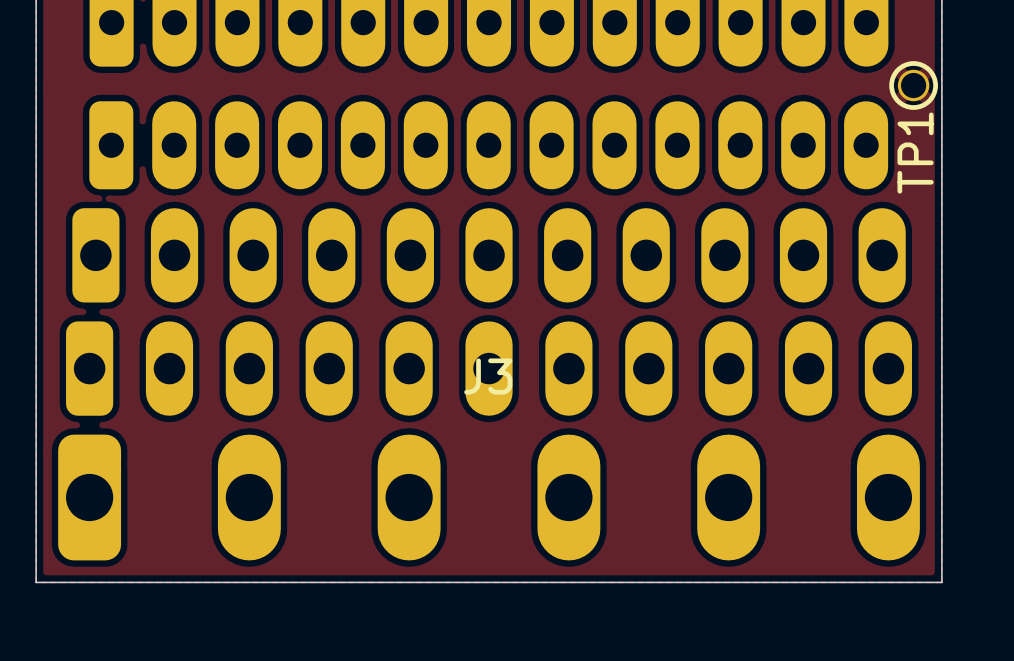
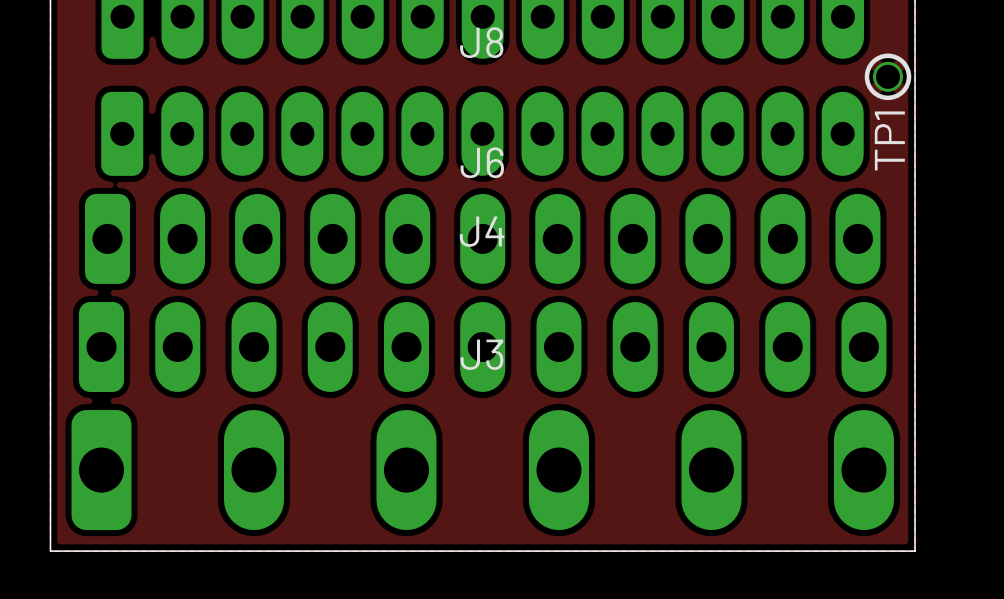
J8 name: none -> J8 (481, 42)
J6 name: none -> J6 (482, 162)
J4 name: none -> J4 (482, 231)

